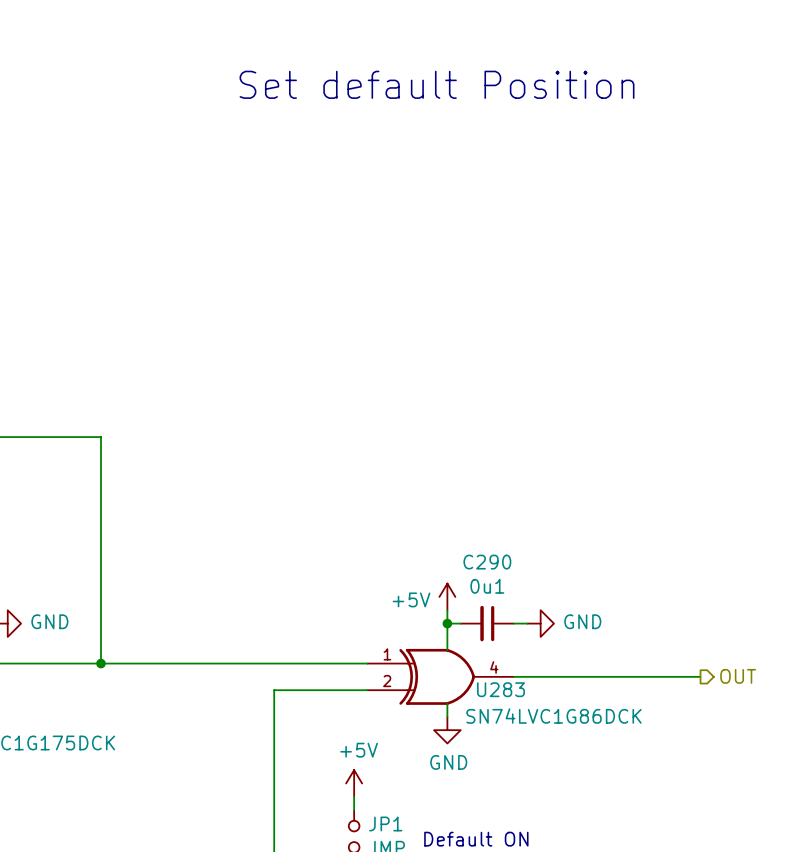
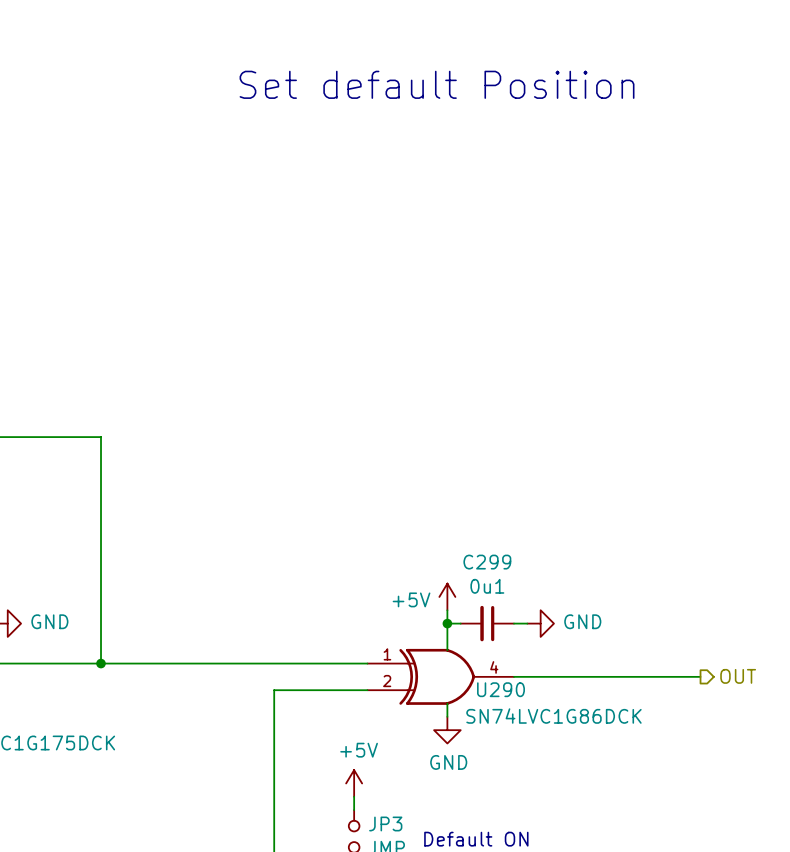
C290 name: C290 (487, 562) -> C299 (487, 562)
U283 name: U283 (501, 689) -> U290 (501, 689)
JP1 name: JP1 (385, 823) -> JP3 (385, 823)

